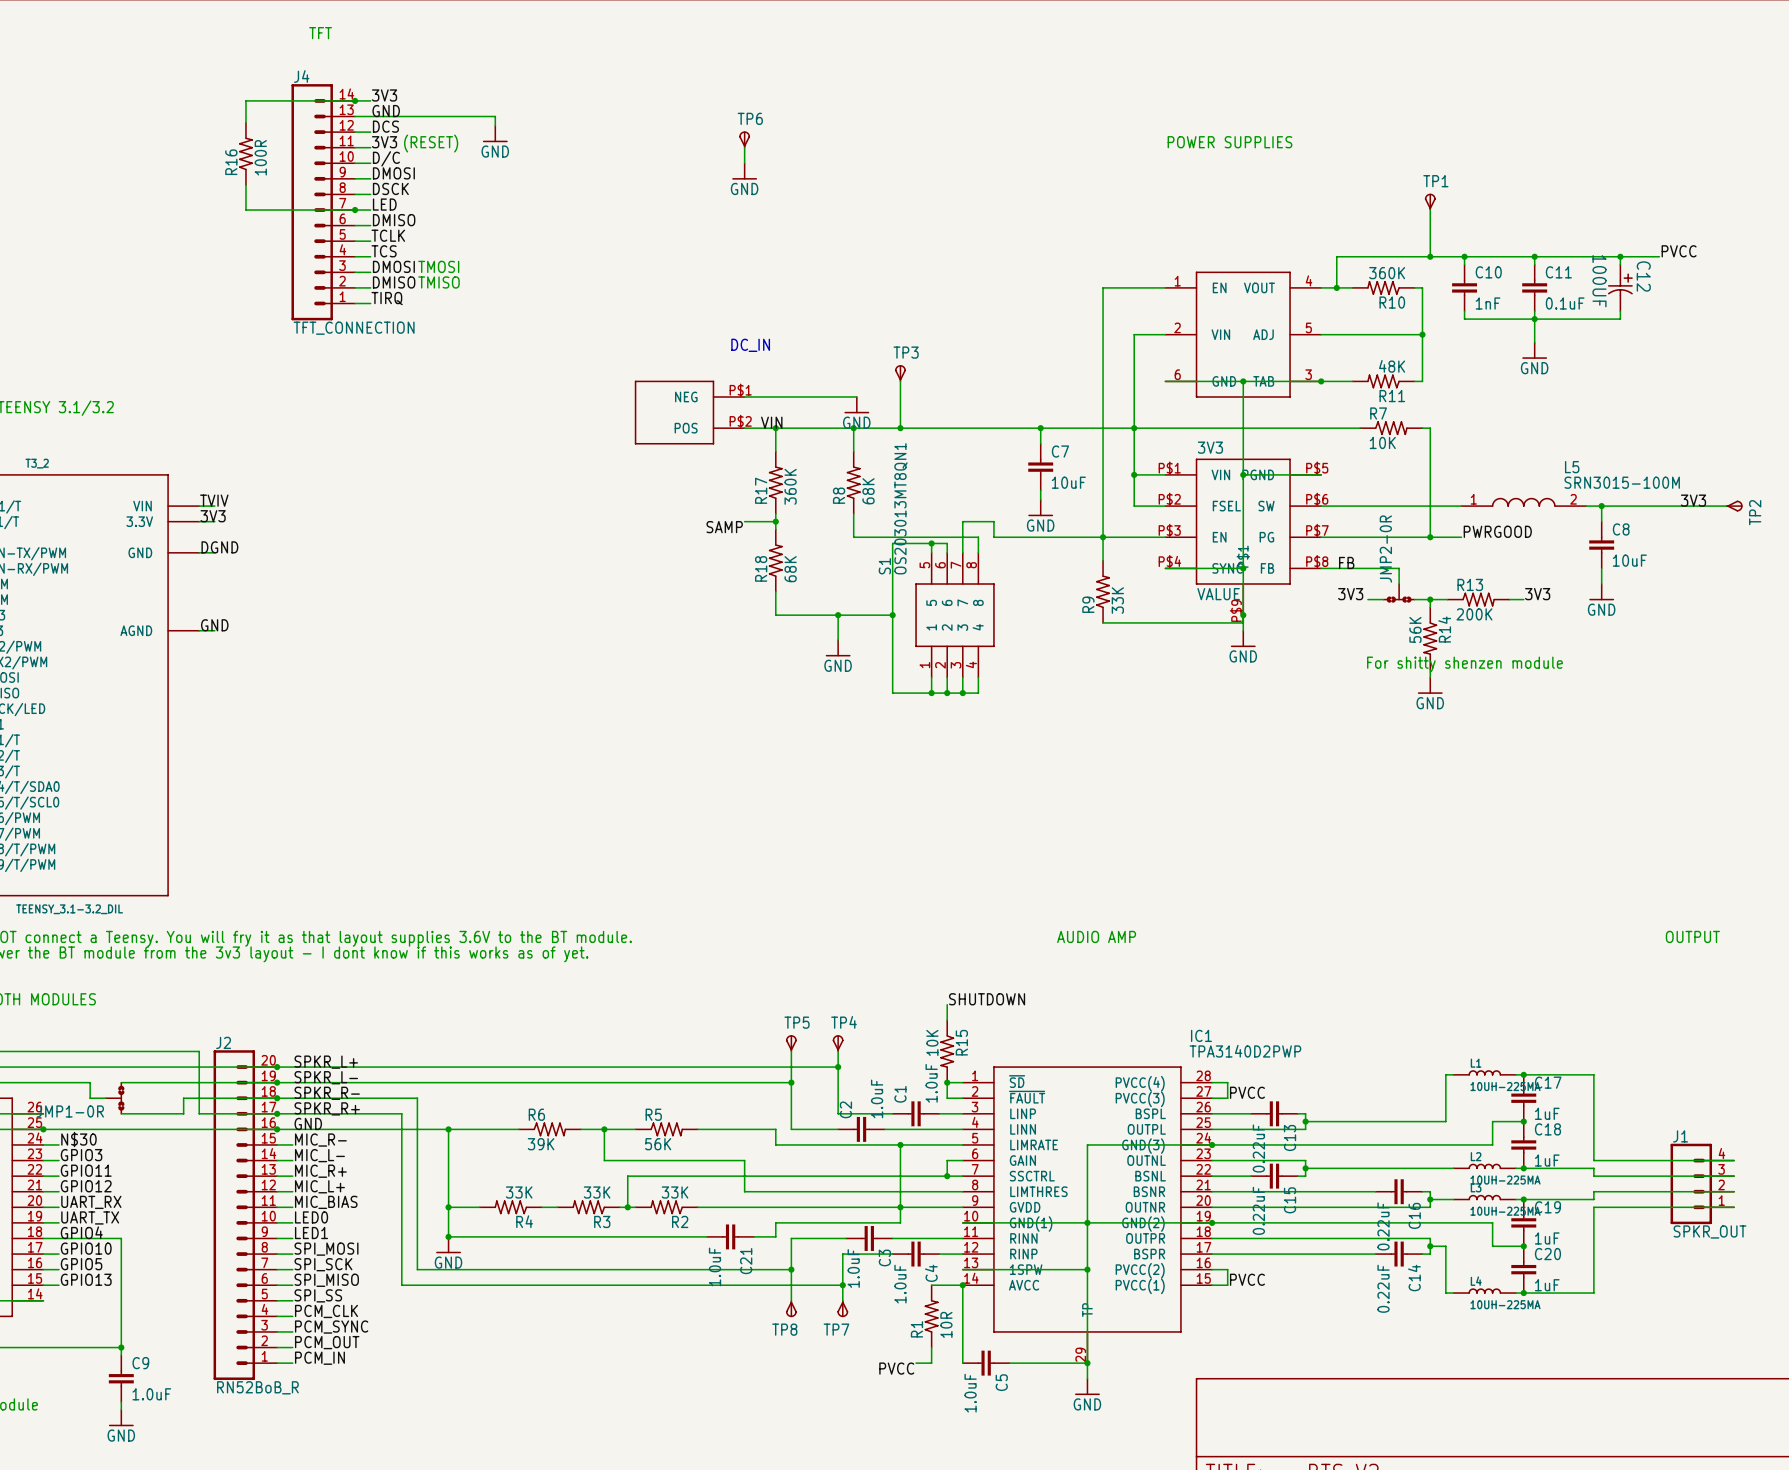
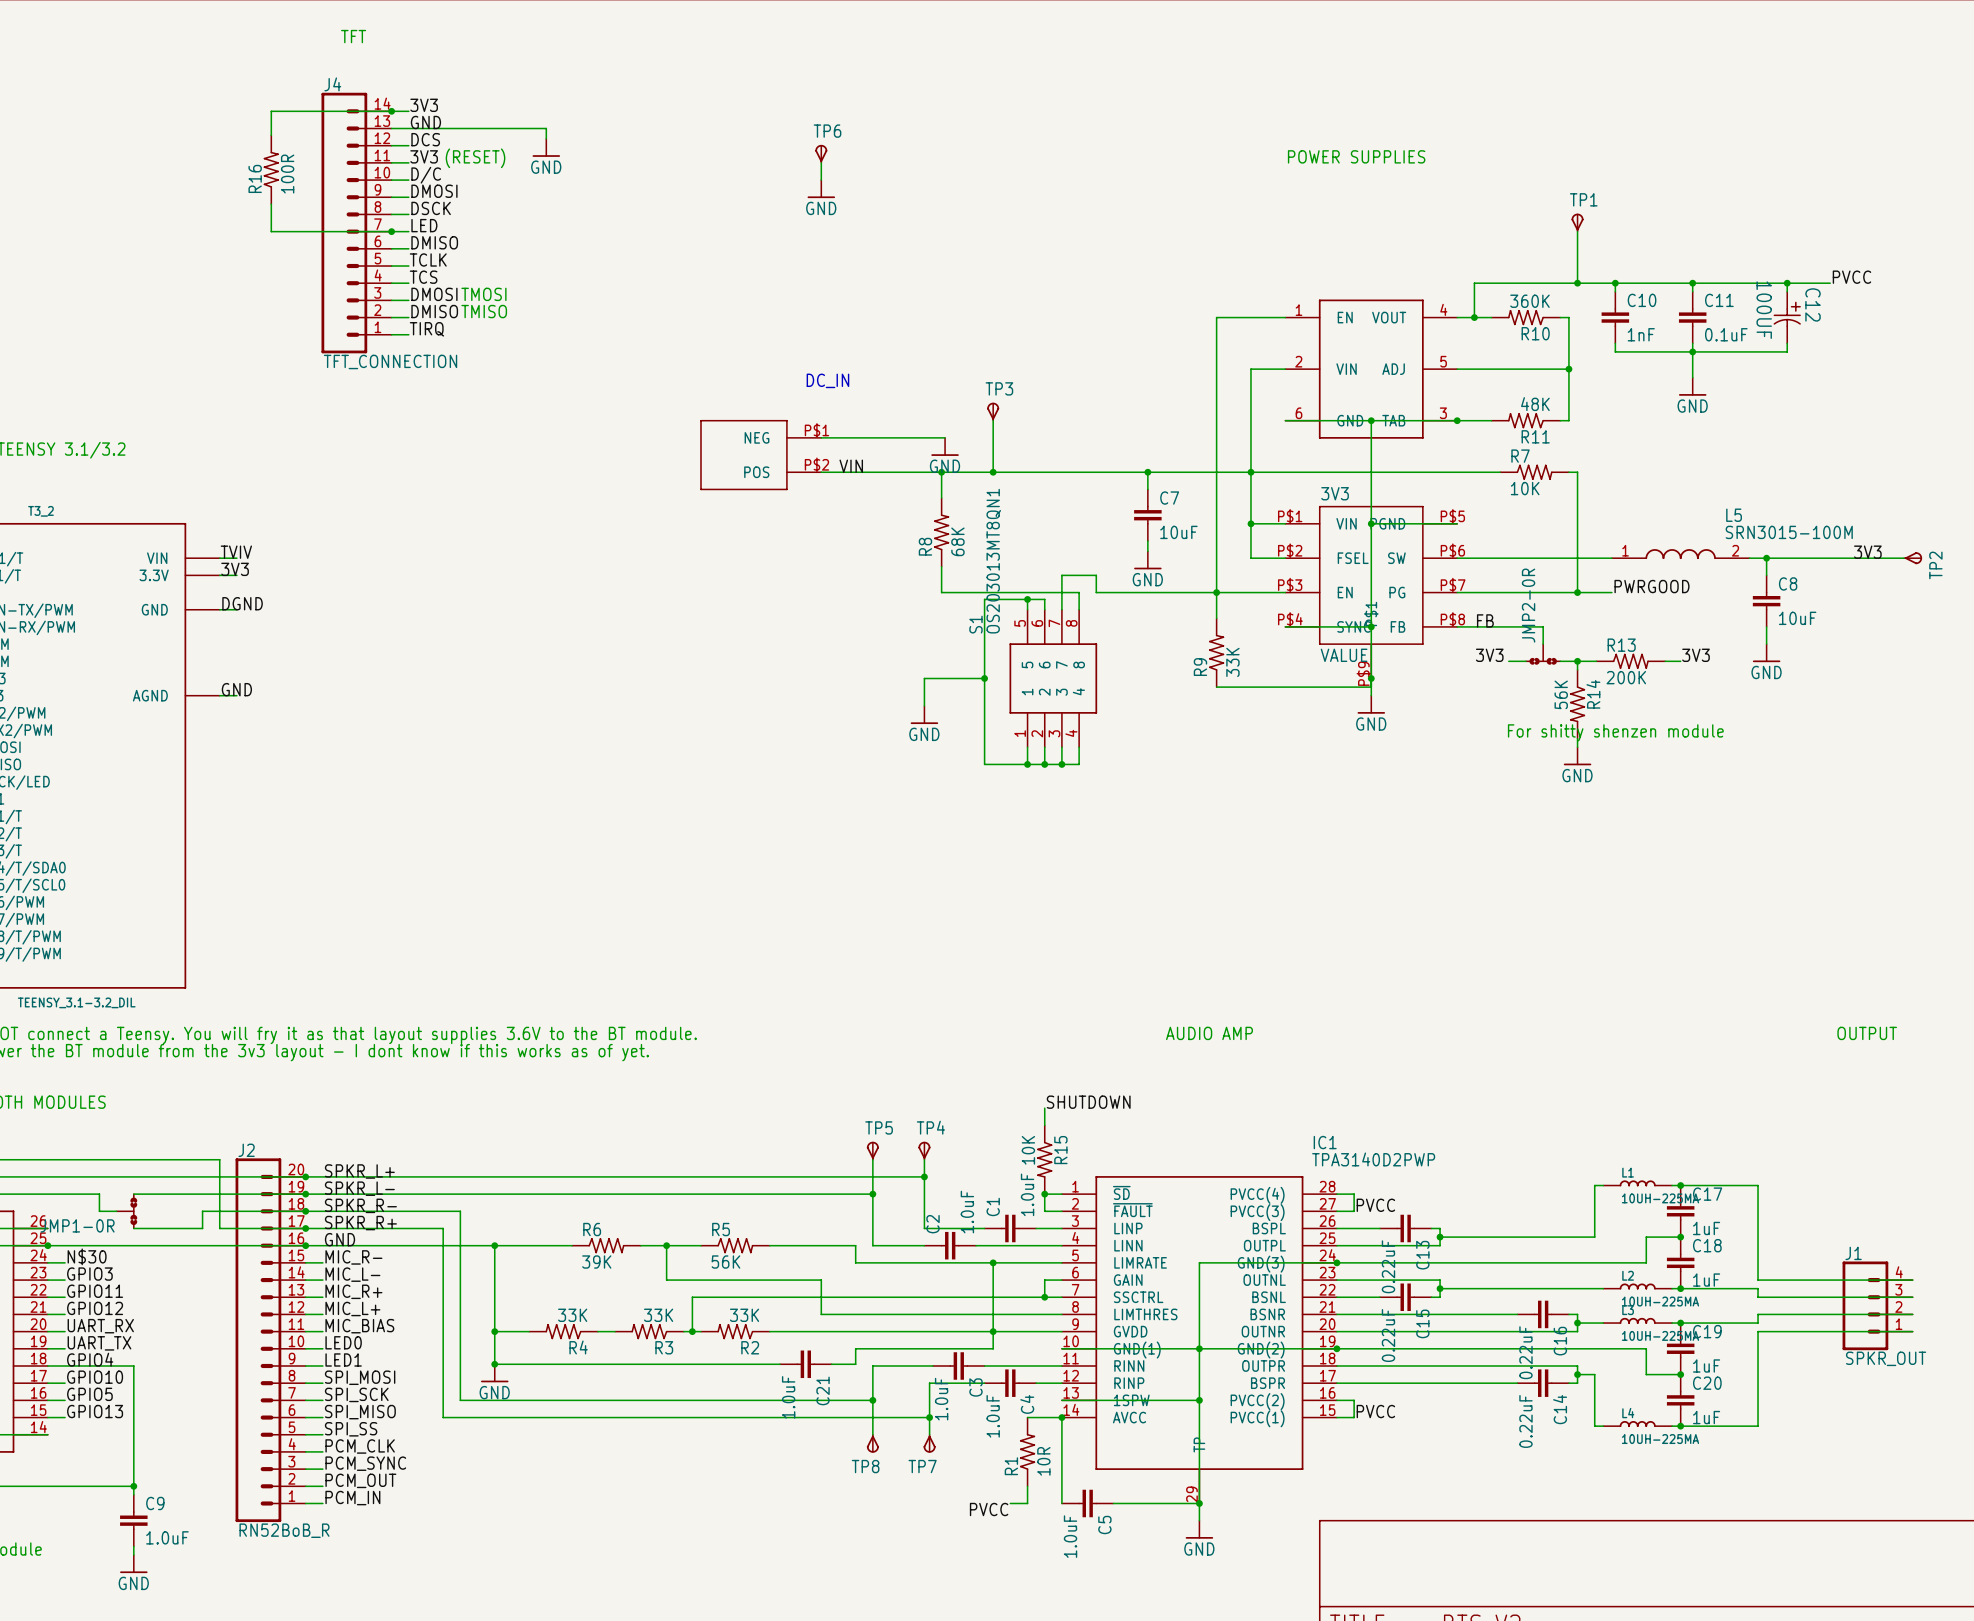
wire: (775, 428) (775, 451) -> none
junction: (775, 428) -> none
R17: 360K (775, 482) -> none
wire: (775, 513) (775, 529) -> none
wire: (744, 521) (775, 521) -> none
junction: (775, 521) -> none
label: SAMP (724, 527) -> none
R18: 68K (775, 560) -> none
wire: (775, 591) (775, 615) (838, 615) -> none
junction: (838, 615) -> none

